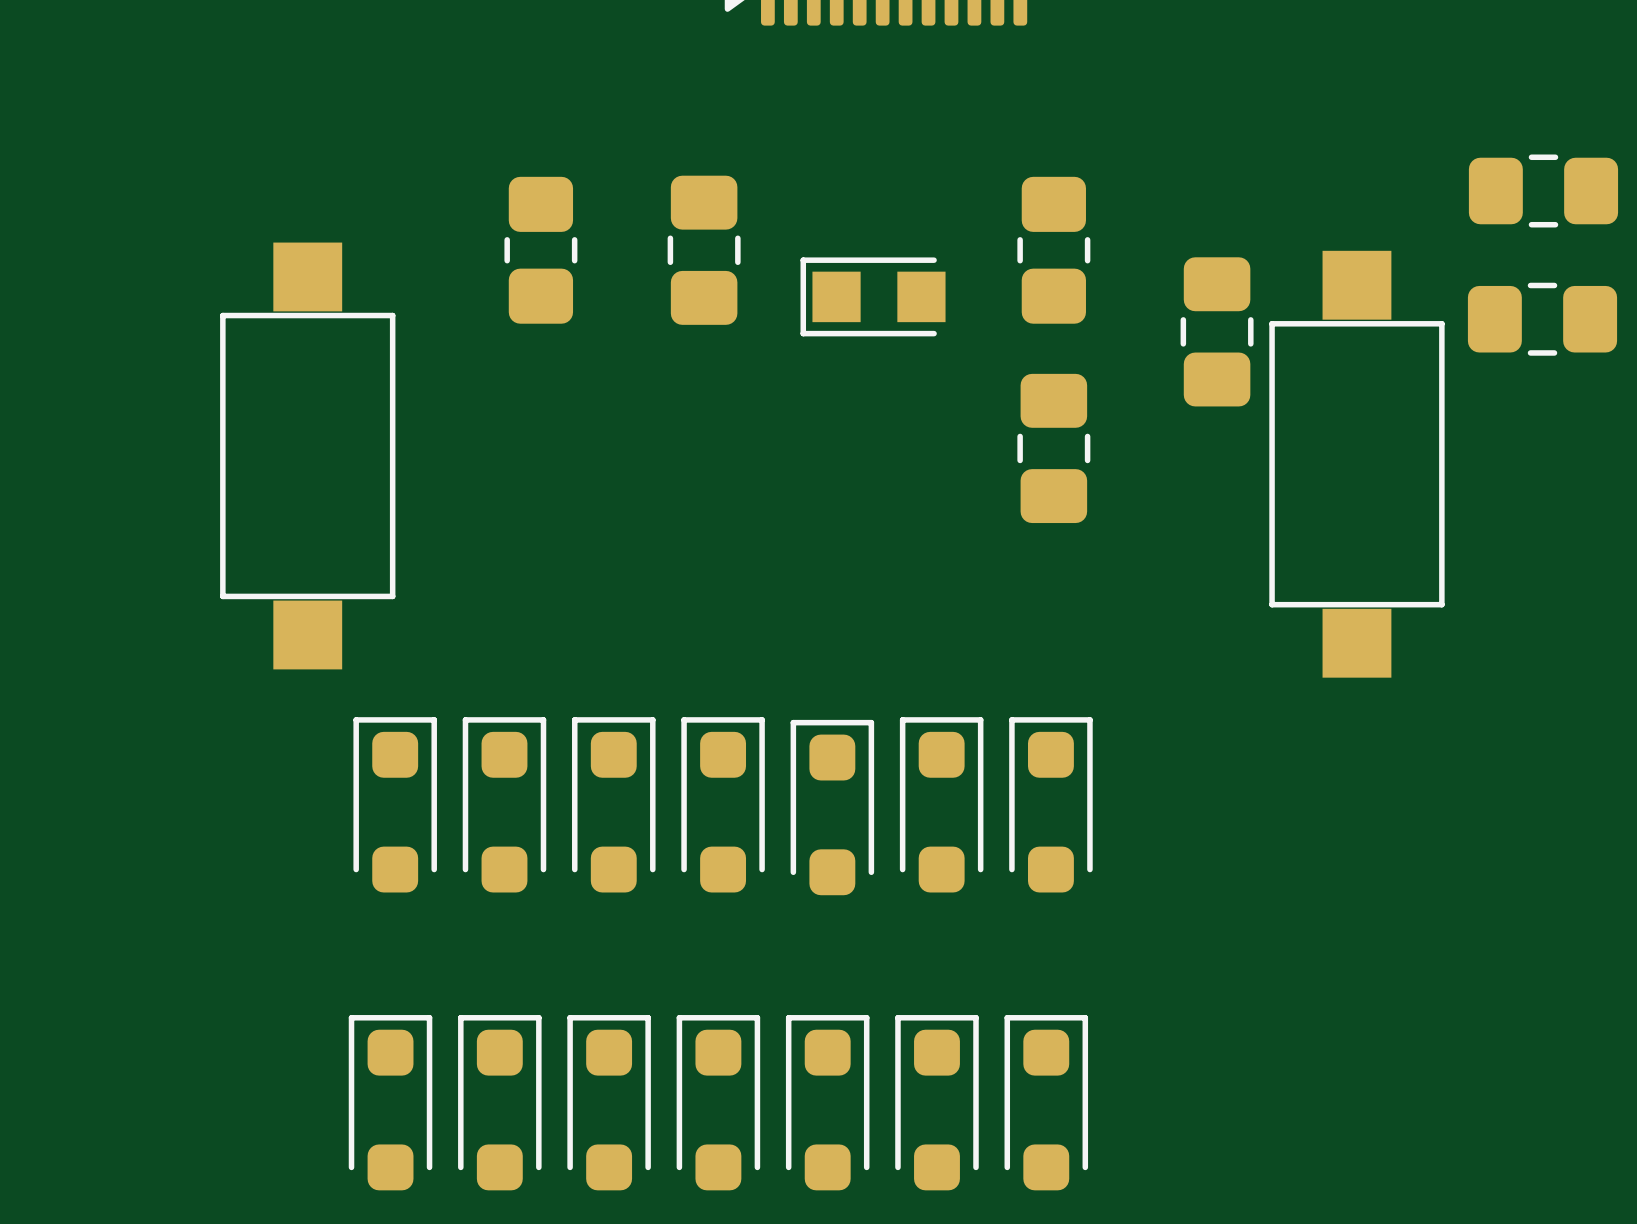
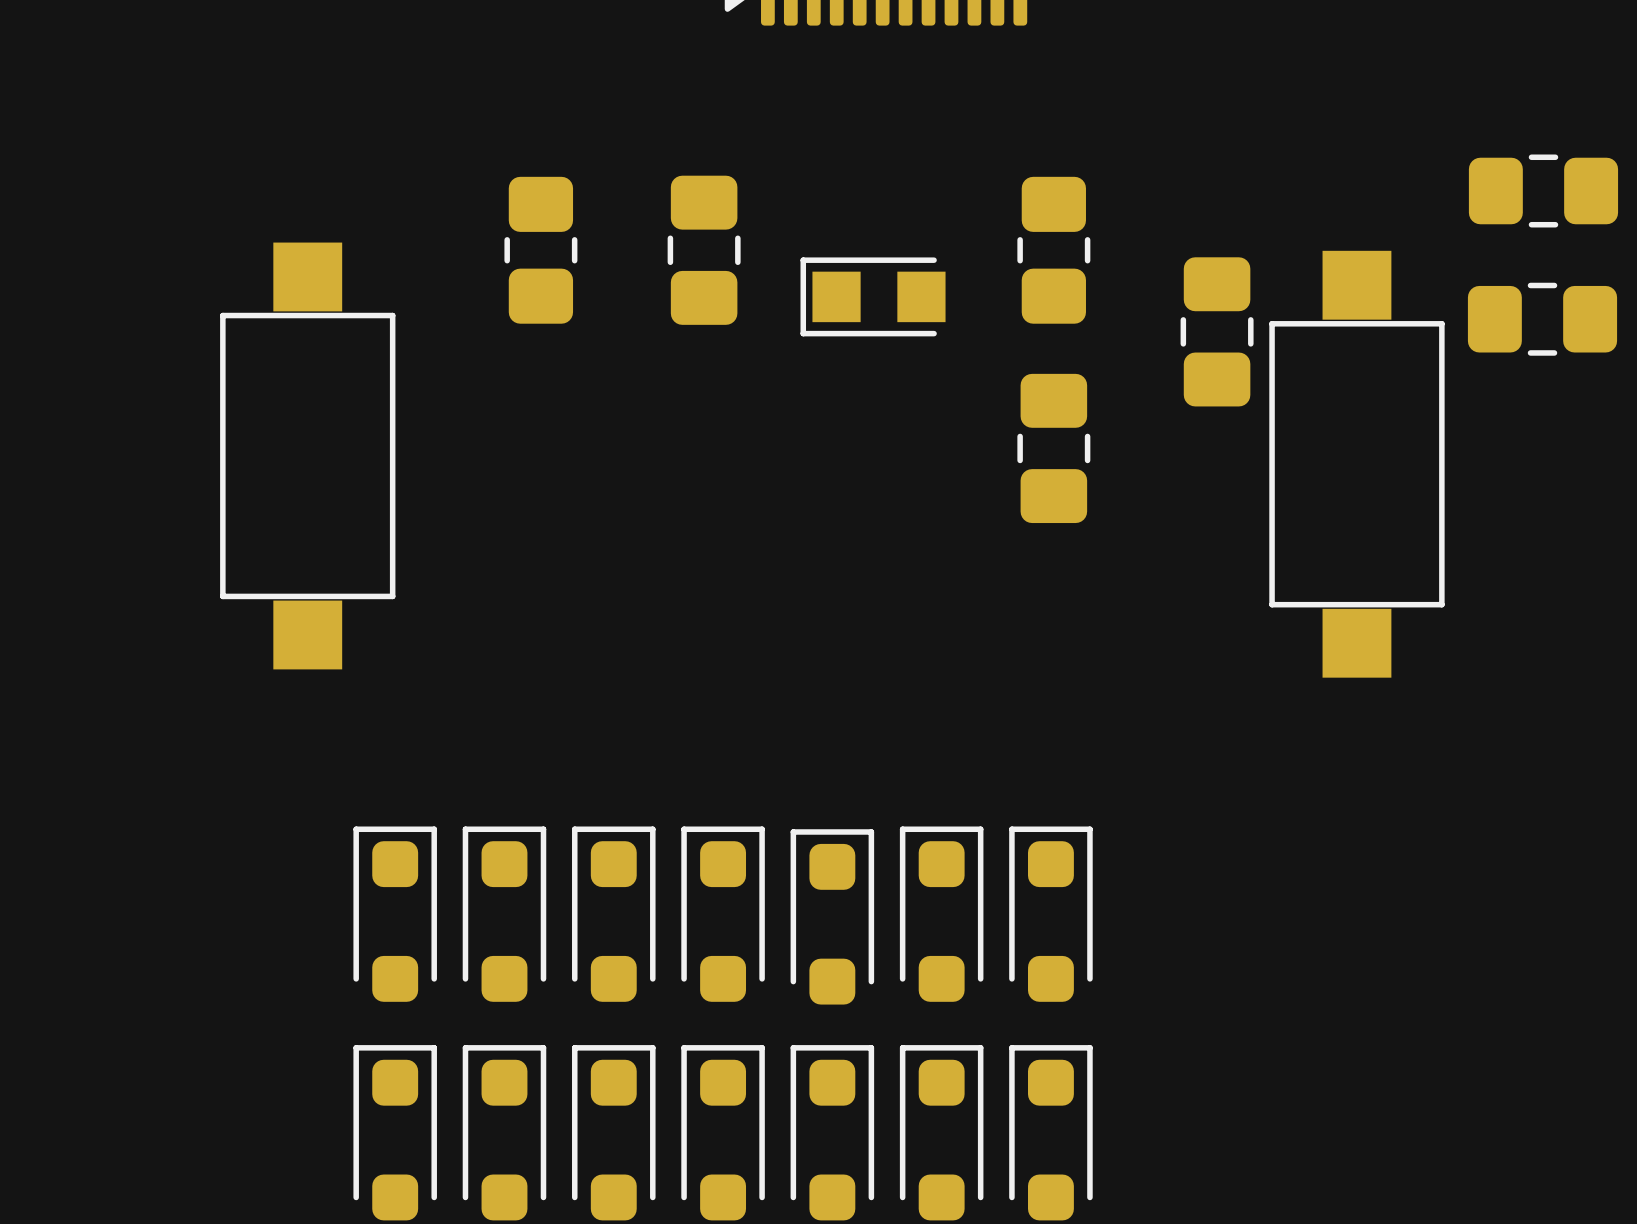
part: (395, 804) -> none
part: (504, 804) -> none
part: (613, 804) -> none
part: (723, 804) -> none
part: (941, 804) -> none
part: (1050, 804) -> none
part: (832, 807) -> none
part: none -> (395, 914)
part: none -> (504, 914)
part: none -> (613, 914)
part: none -> (723, 914)
part: none -> (941, 914)
part: none -> (1050, 914)
part: none -> (832, 916)
part position: (390, 1102) -> (395, 1132)
part position: (499, 1102) -> (504, 1132)
part position: (609, 1102) -> (613, 1132)
part position: (718, 1102) -> (723, 1132)
part position: (827, 1102) -> (832, 1132)
part position: (936, 1102) -> (941, 1132)
part position: (1046, 1102) -> (1050, 1132)

